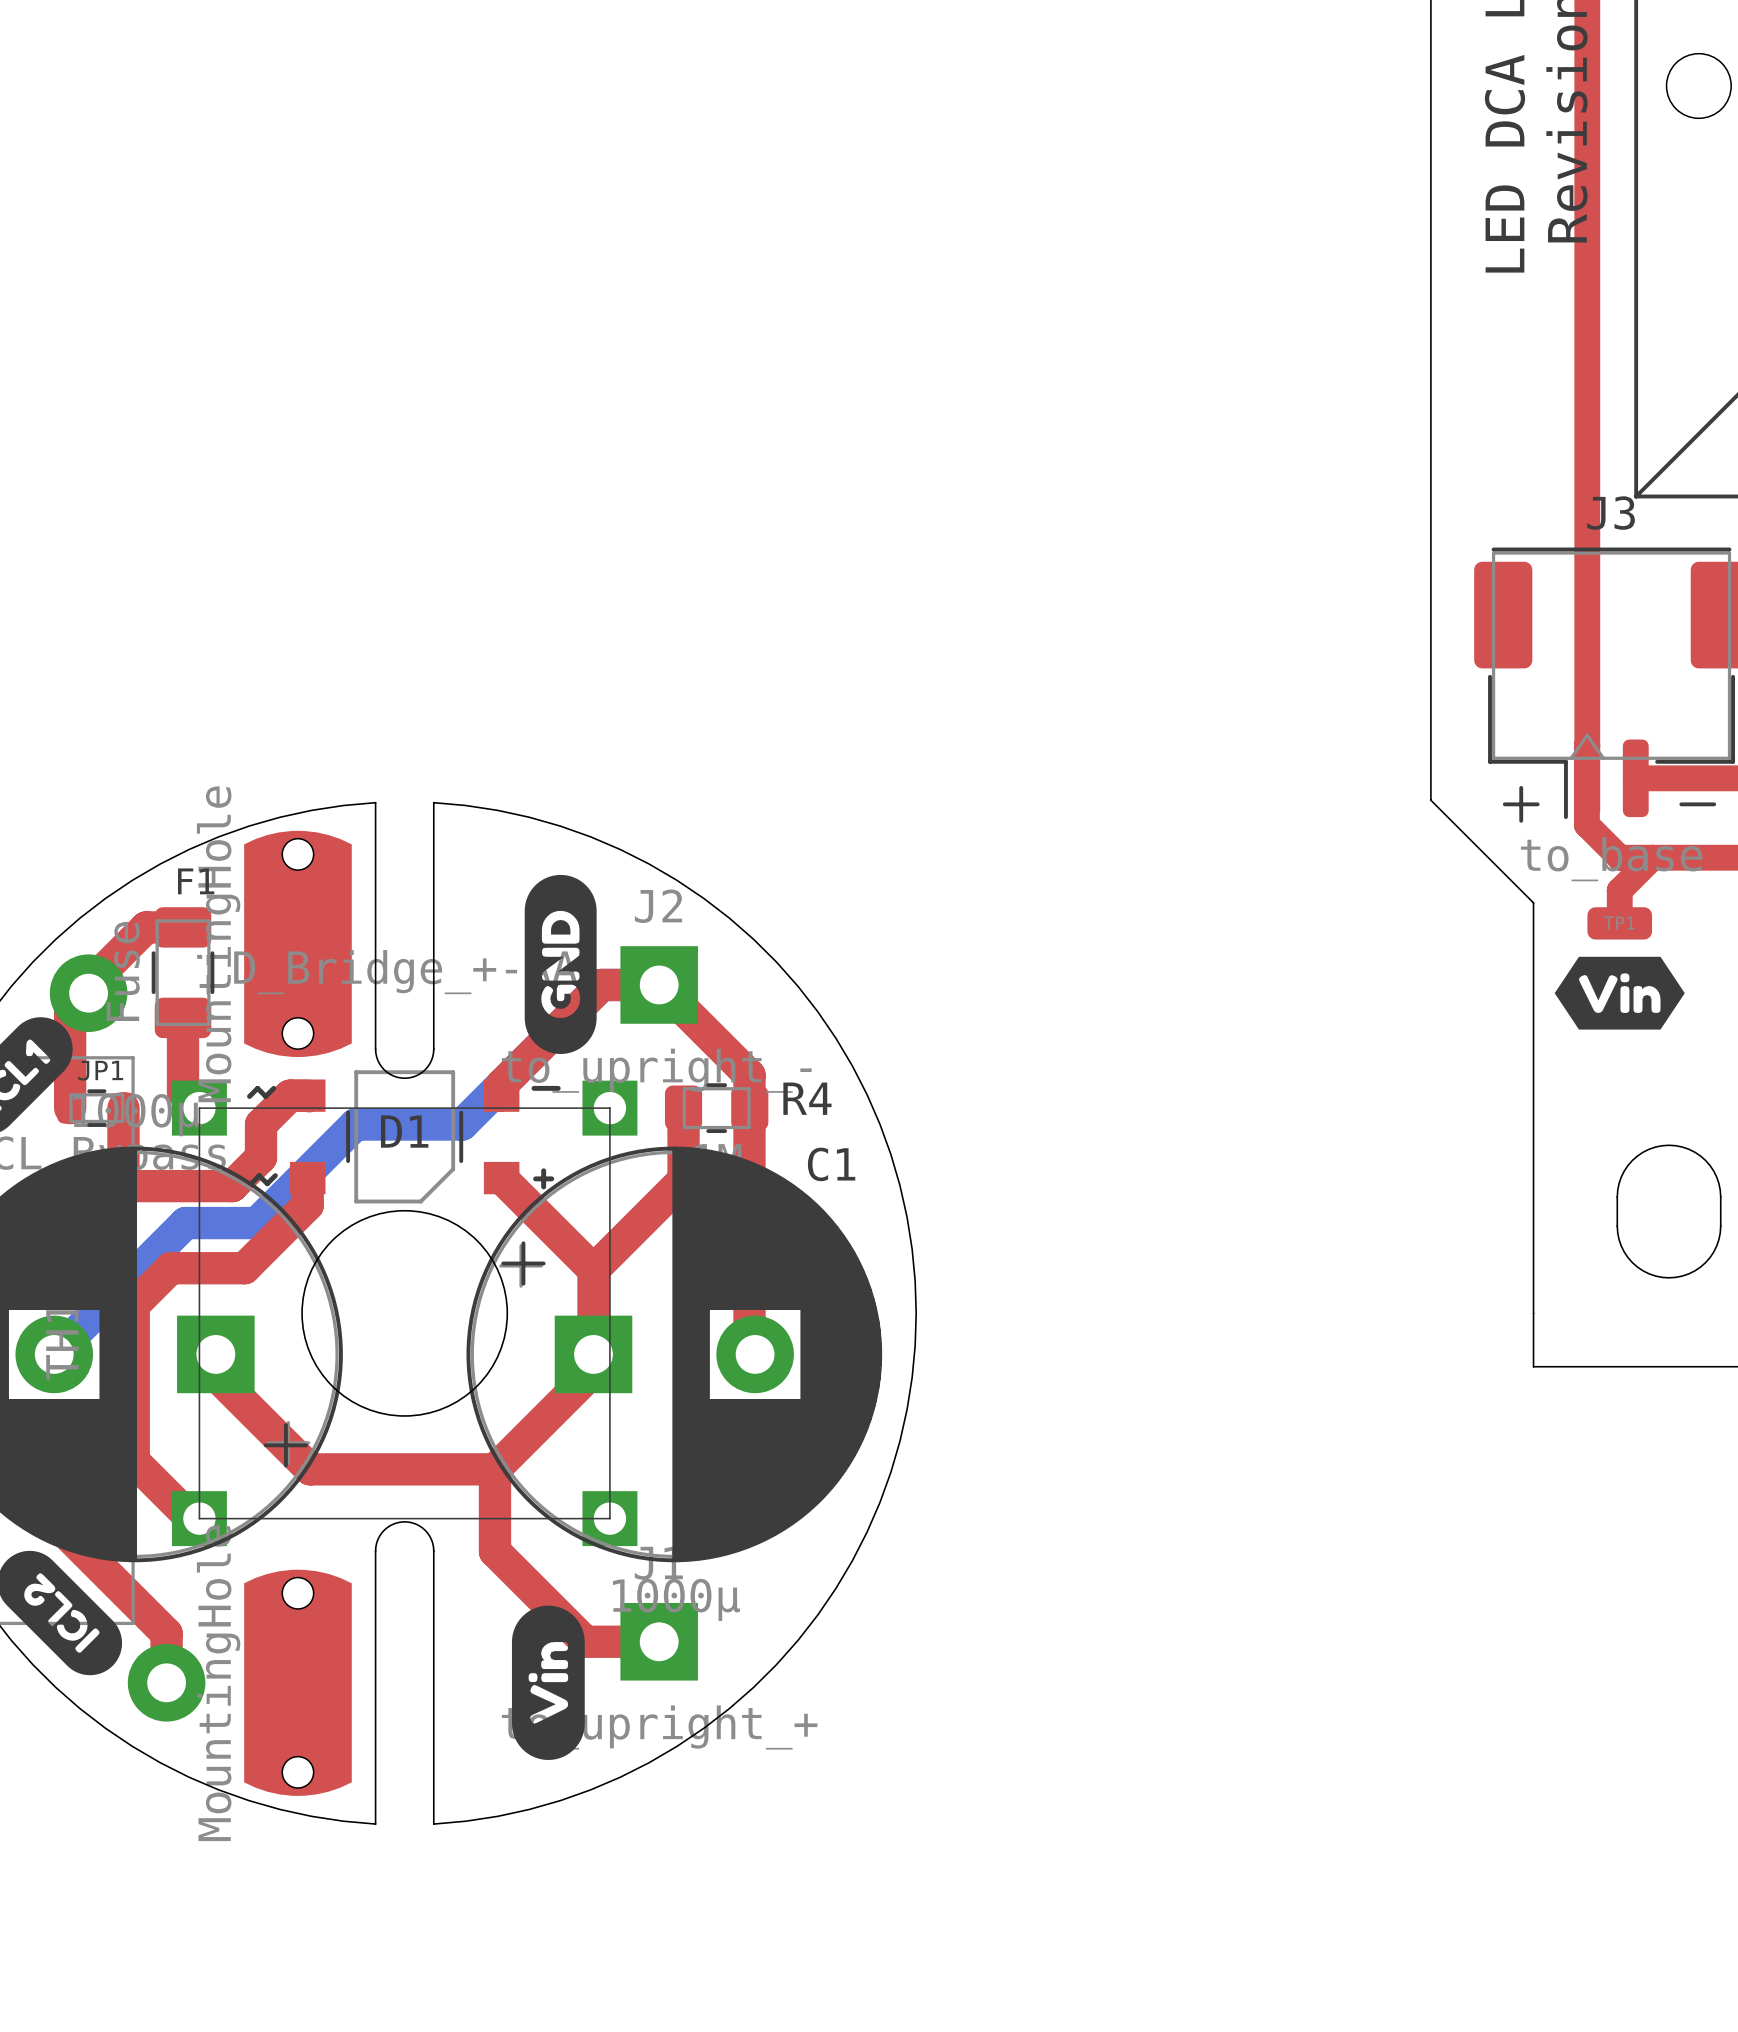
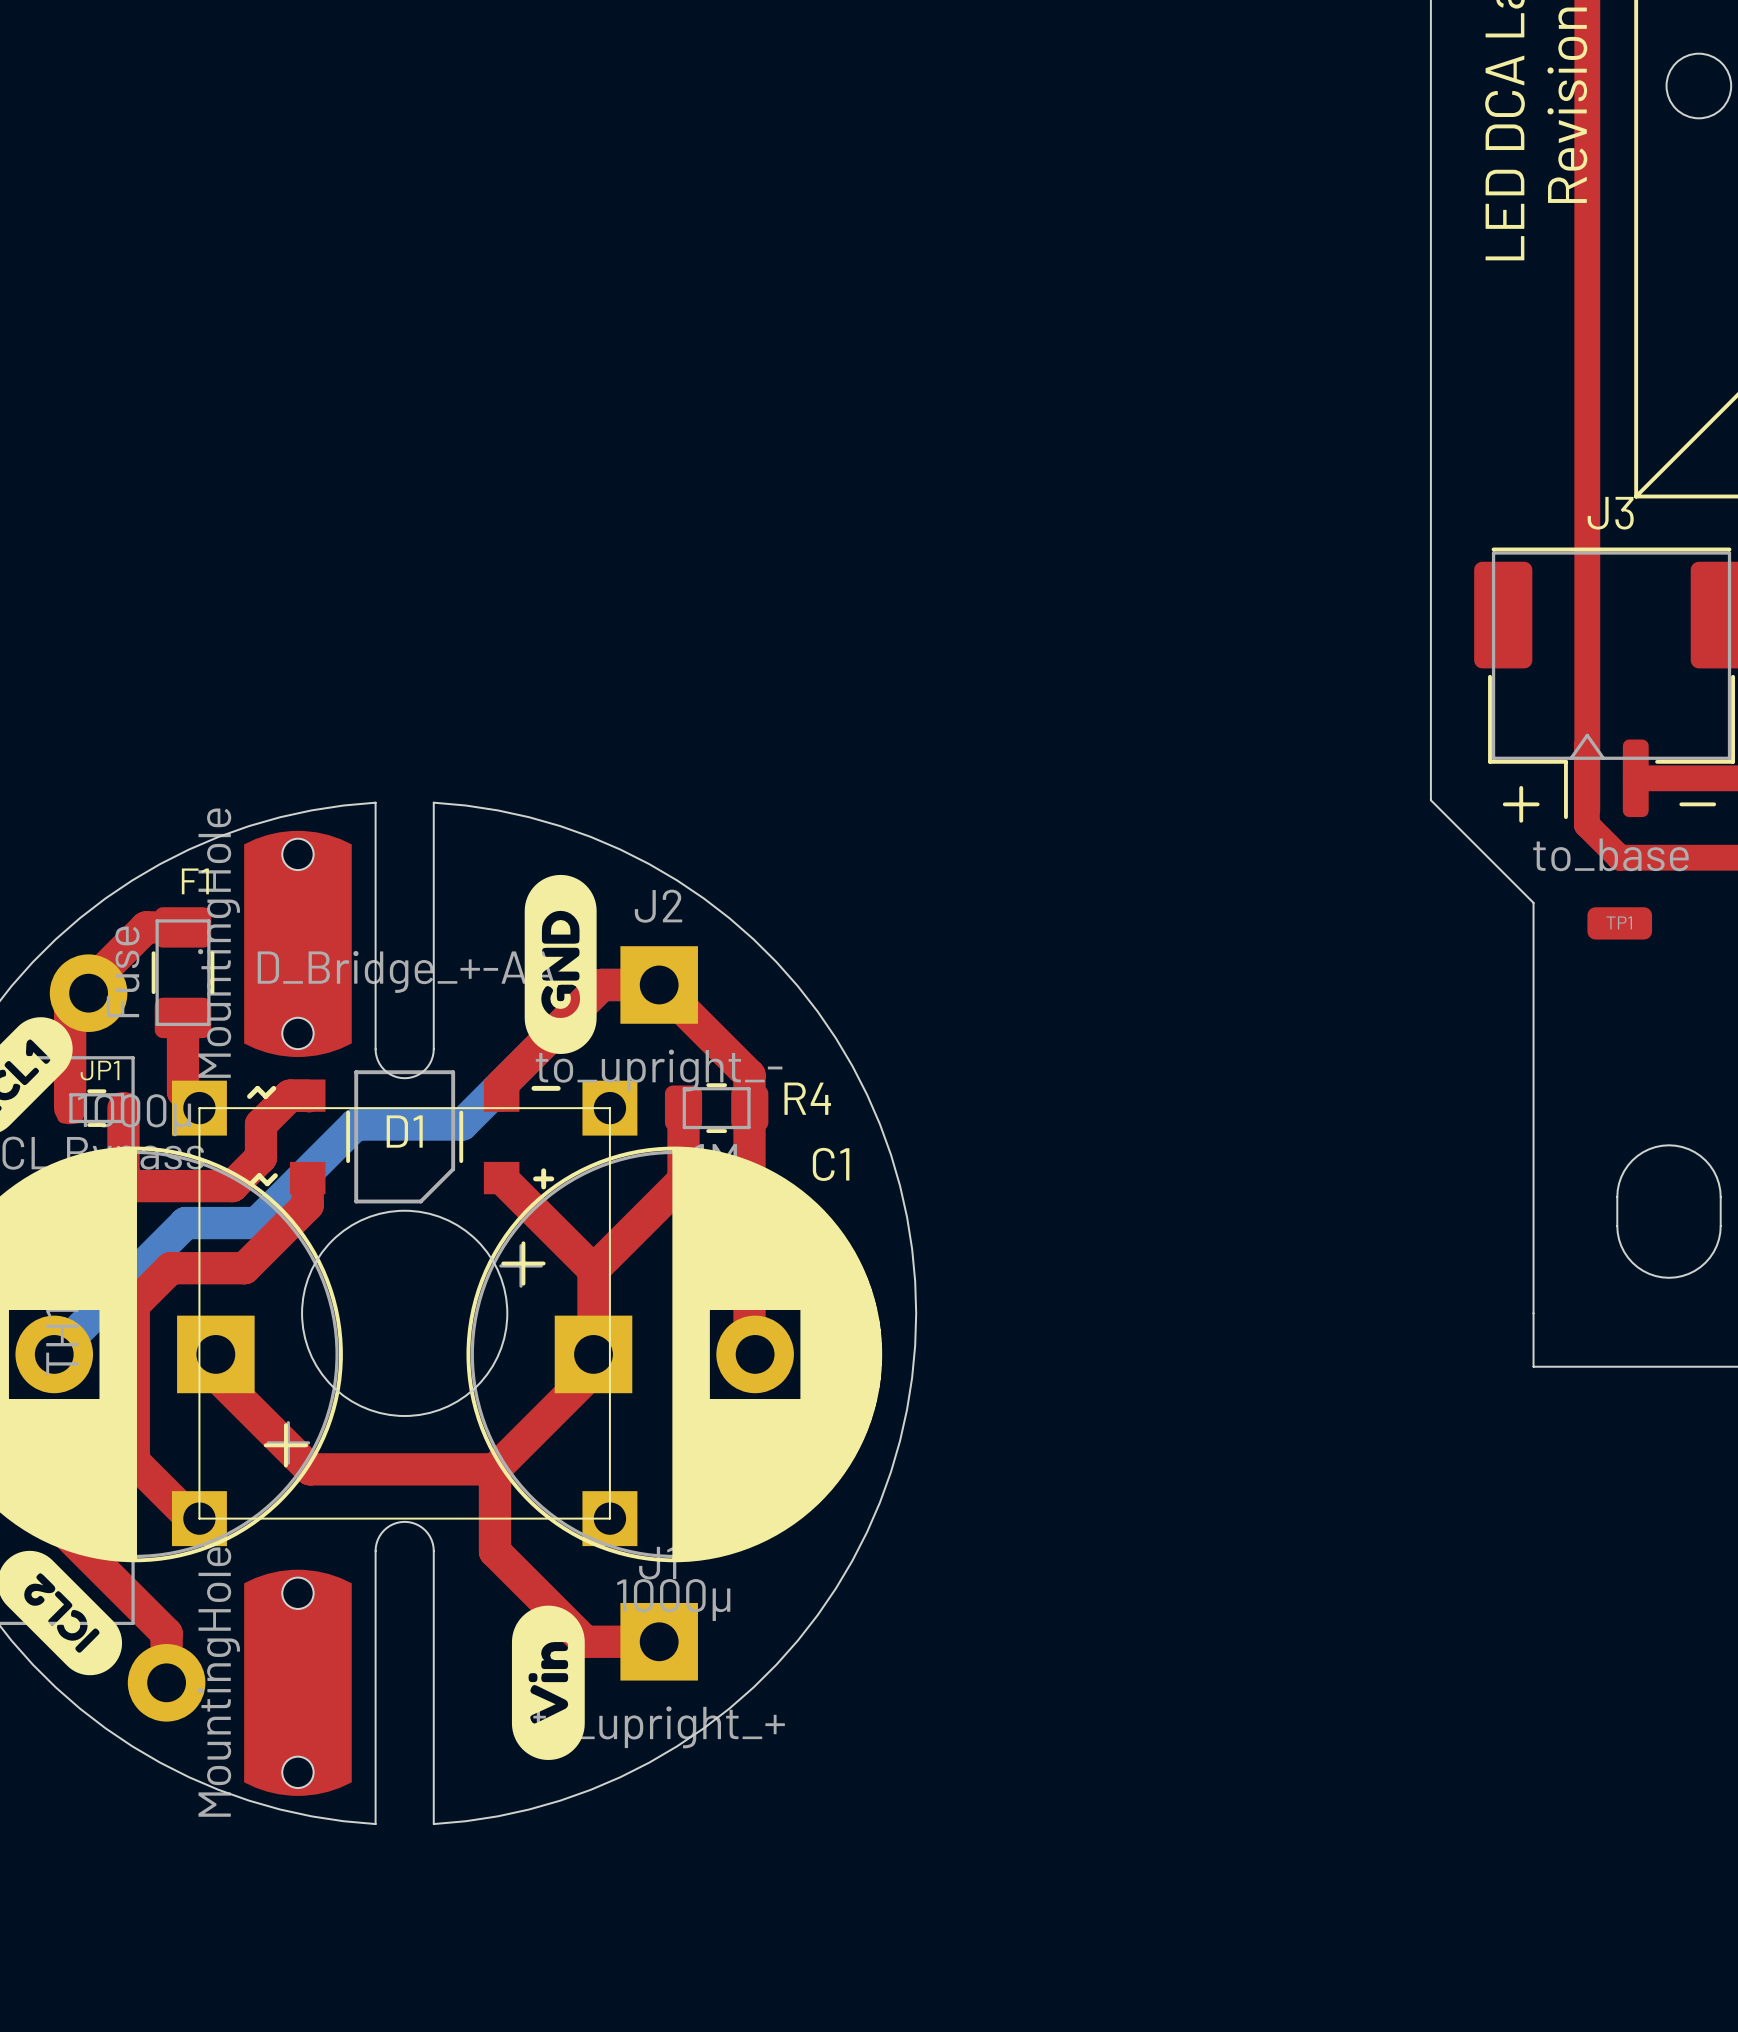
top track: (1652, 857) (1619, 890) (1619, 923) -> none
drawing: [1554, 956, 1685, 1030] -> none

